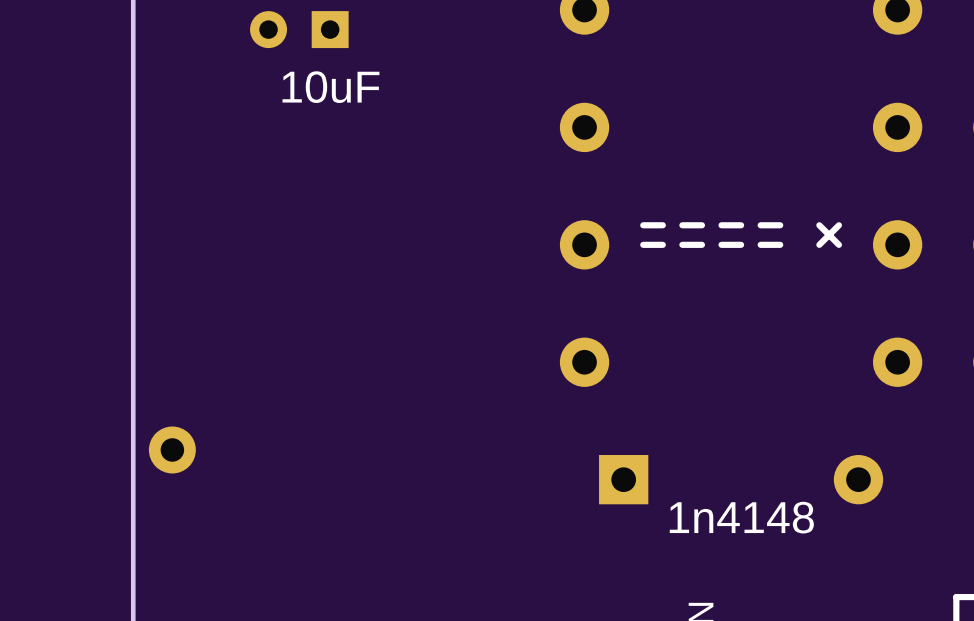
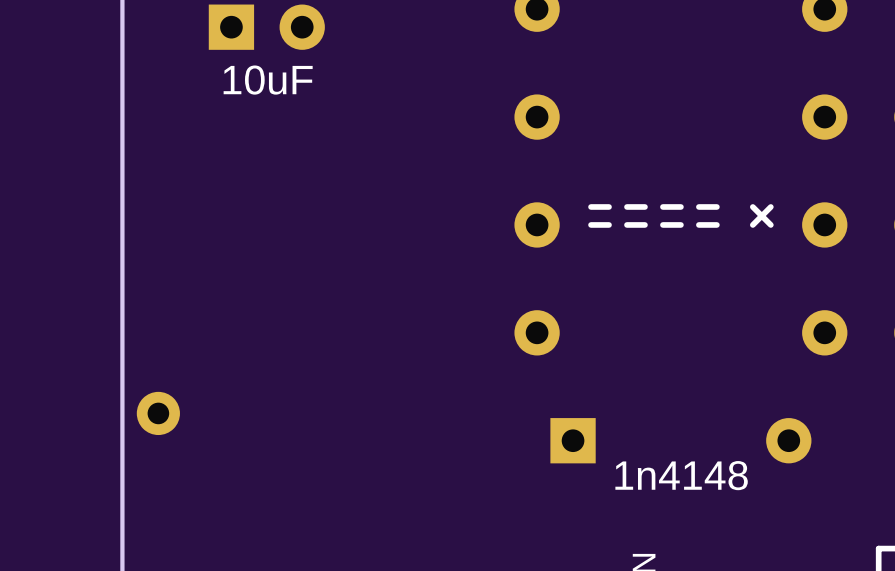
part footprint: [250, 11, 349, 49] -> [208, 4, 325, 50]
part value position: 10uF (330, 87) -> 10uF (268, 80)

